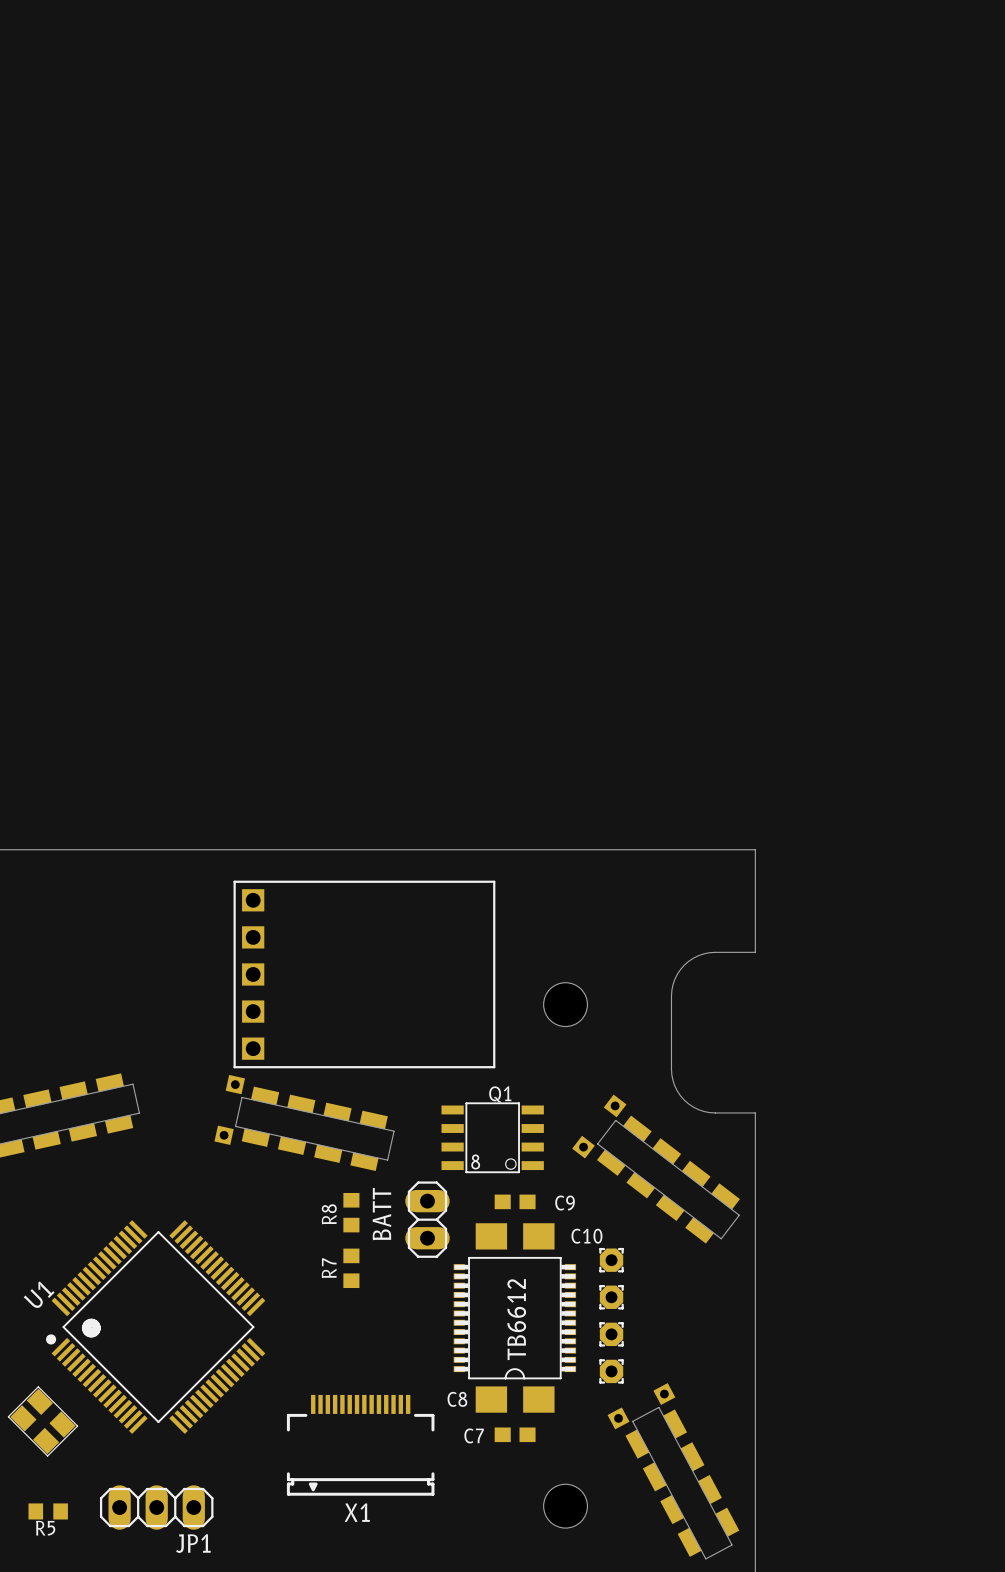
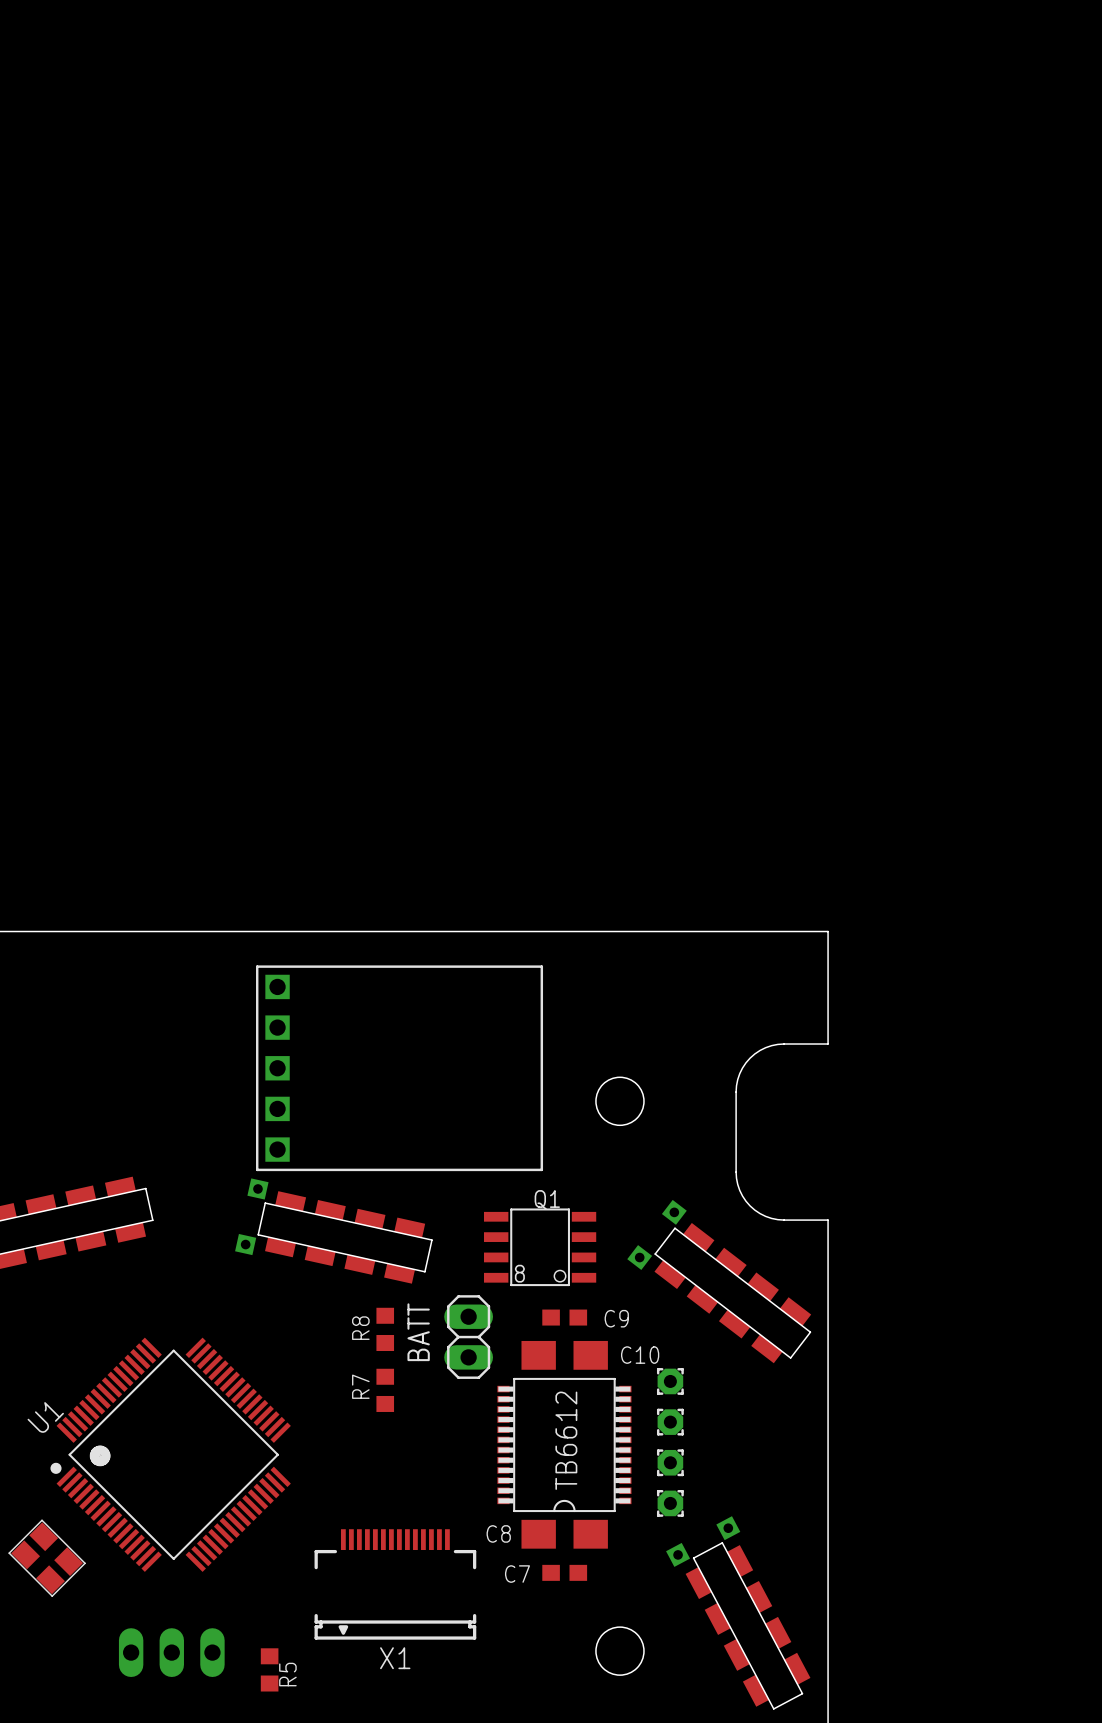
JP1 side: top (156, 1507) -> bottom (171, 1652)
R5 rotation: 0° (48, 1511) -> 90° clockwise (269, 1669)
R5 position: (48, 1511) -> (269, 1669)

